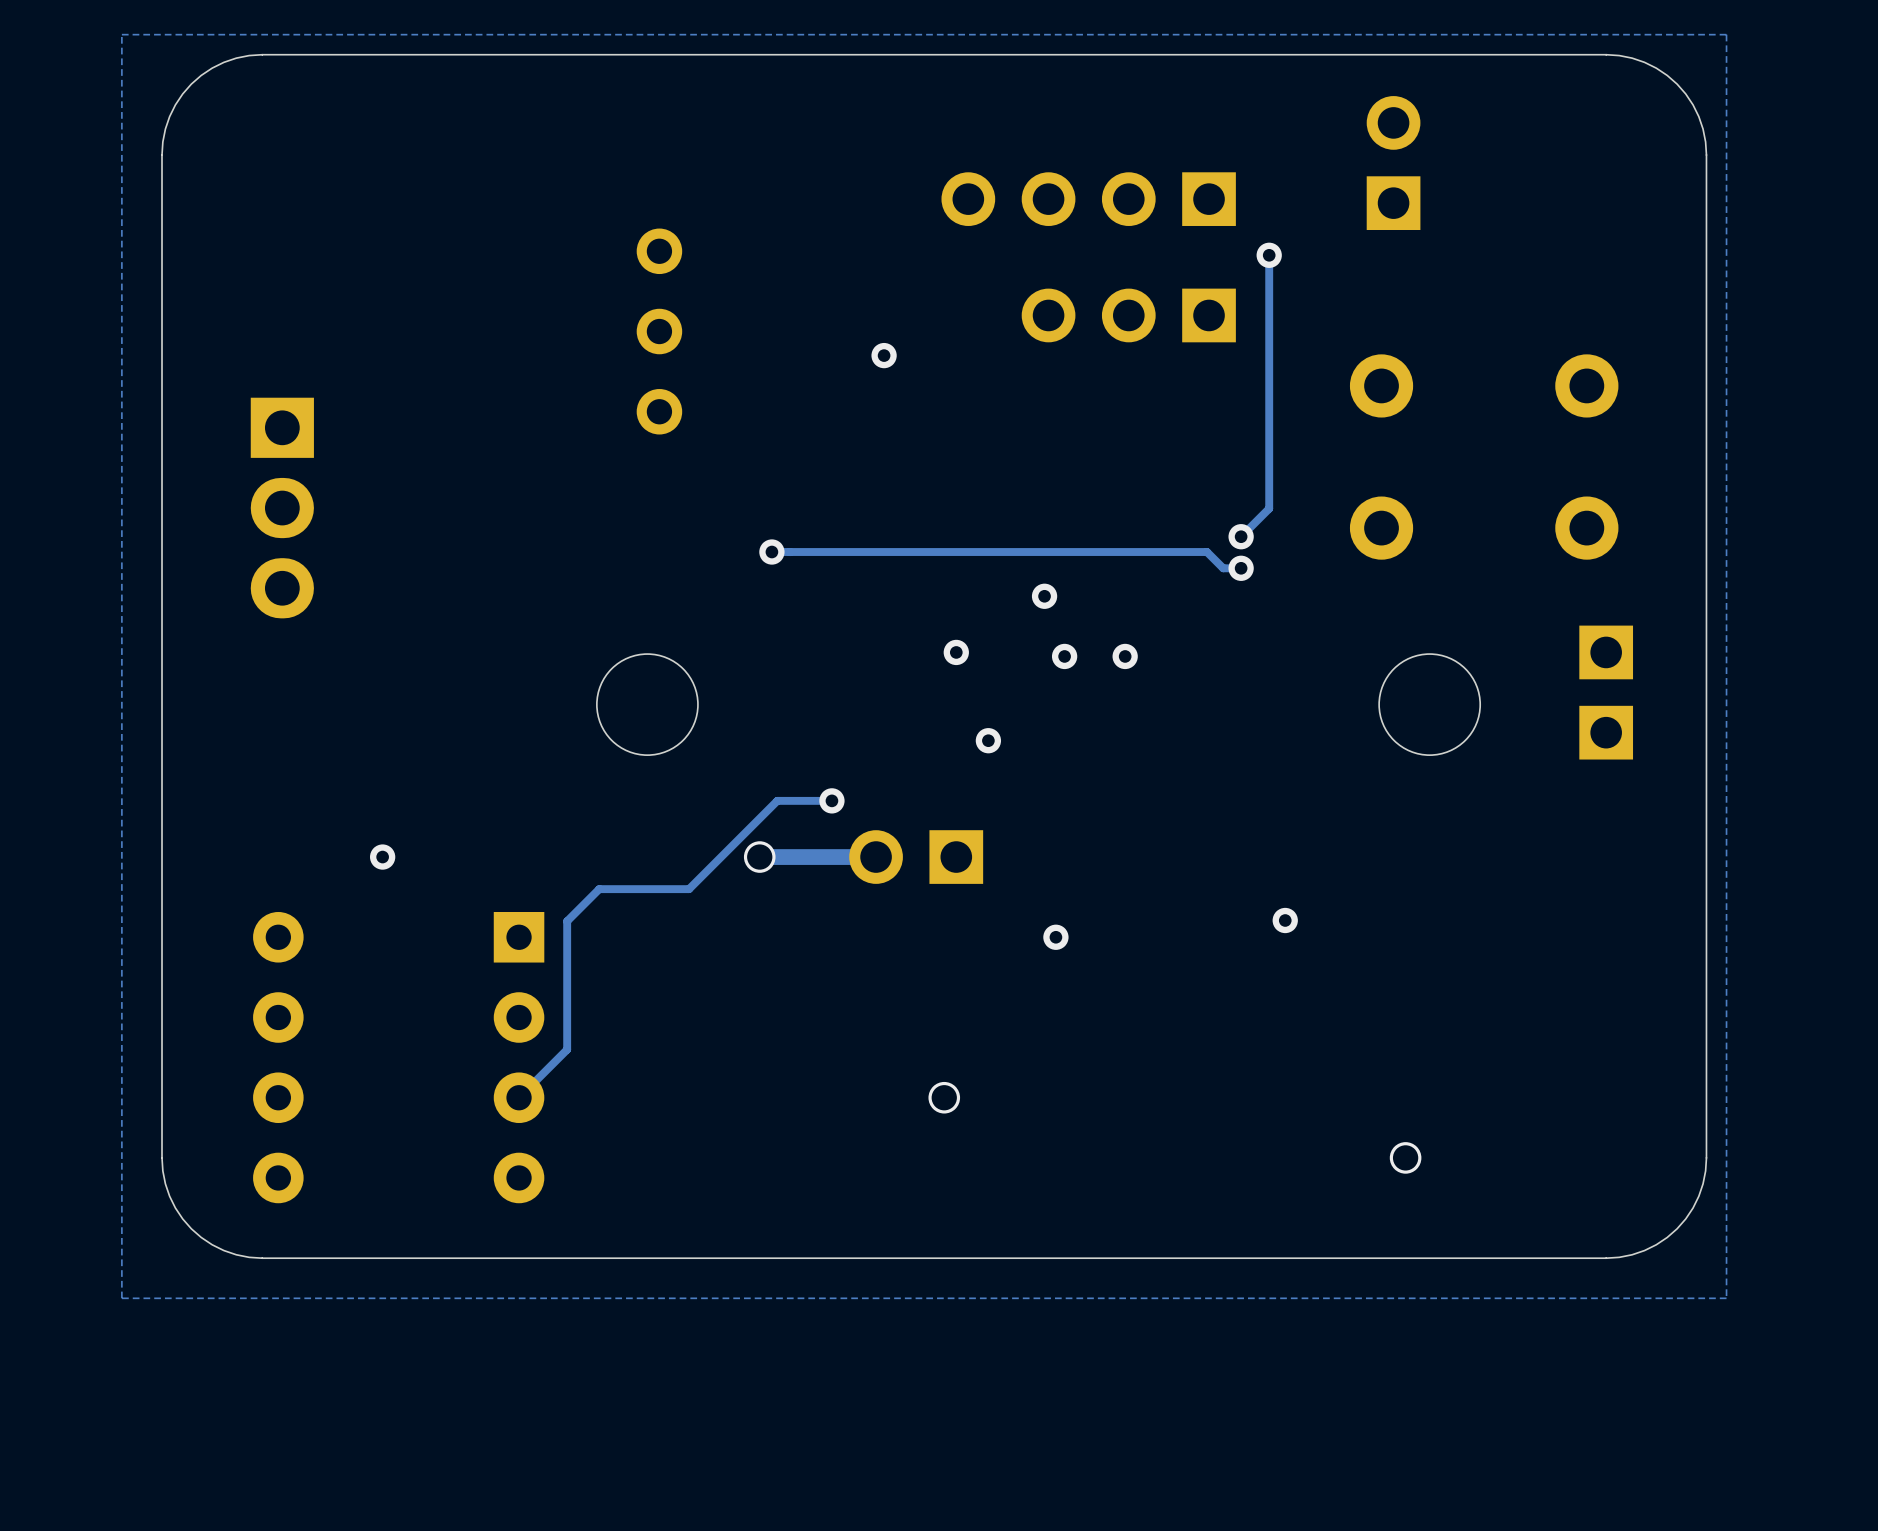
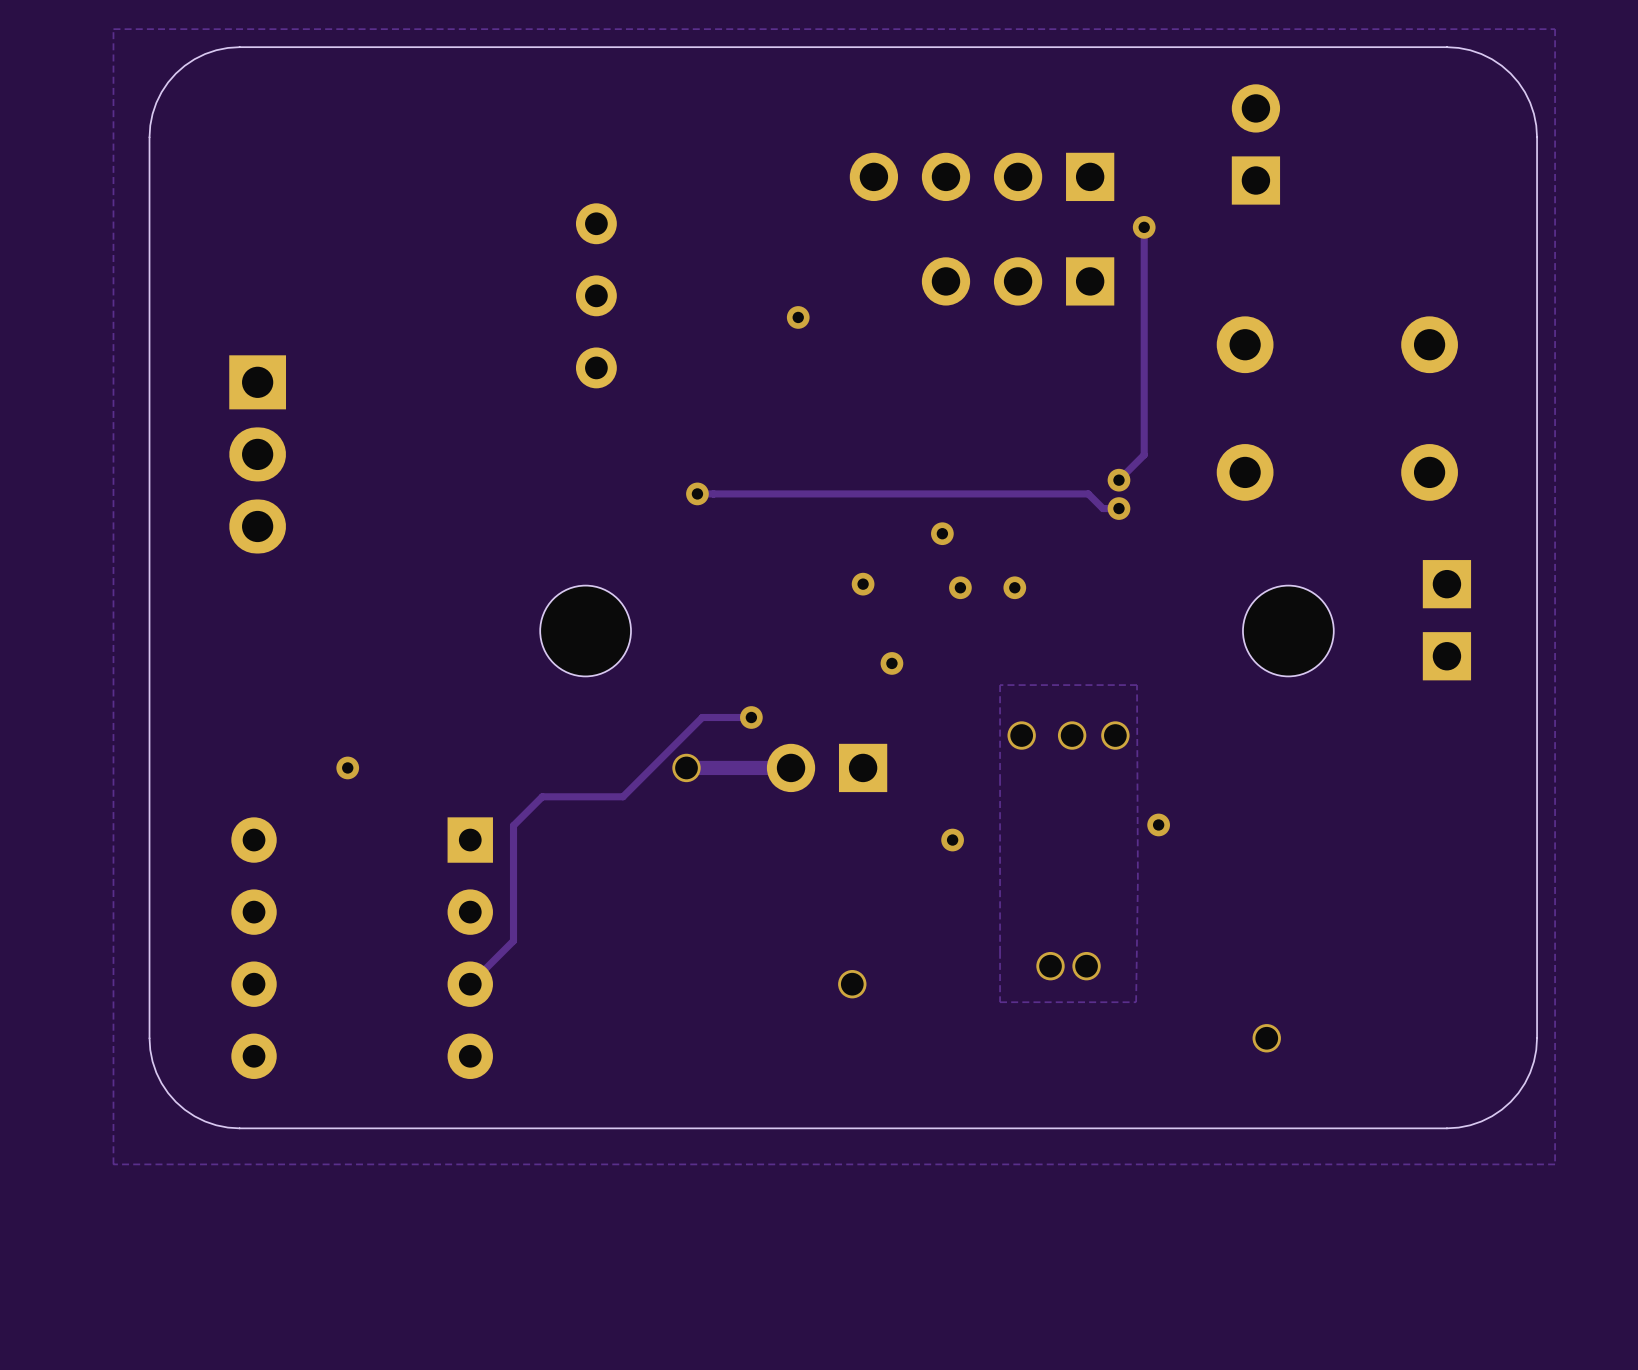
zone outline: none -> (1137, 685) (1000, 685) (1000, 1002) (1136, 1002) (1137, 685)
via: none -> (1021, 735)
via: none -> (1072, 735)
via: none -> (1115, 735)
via: none -> (1050, 966)
via: none -> (1086, 966)

